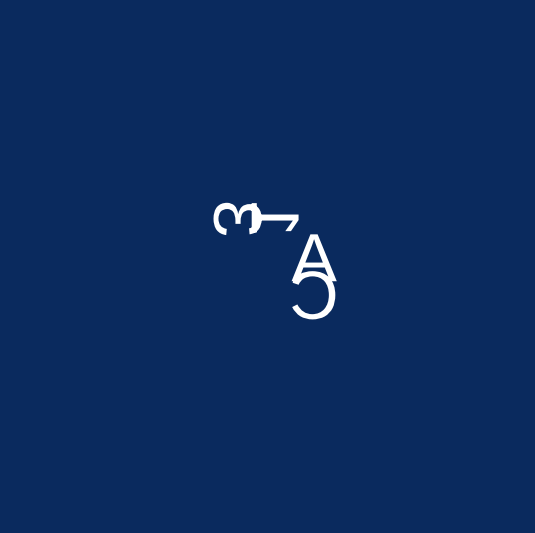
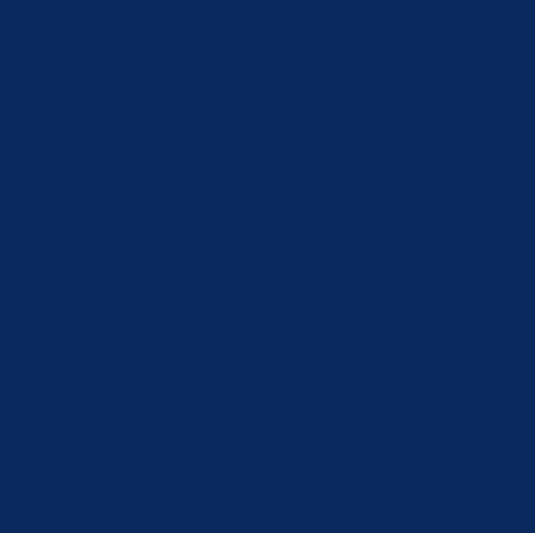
part: (275, 261) -> none

